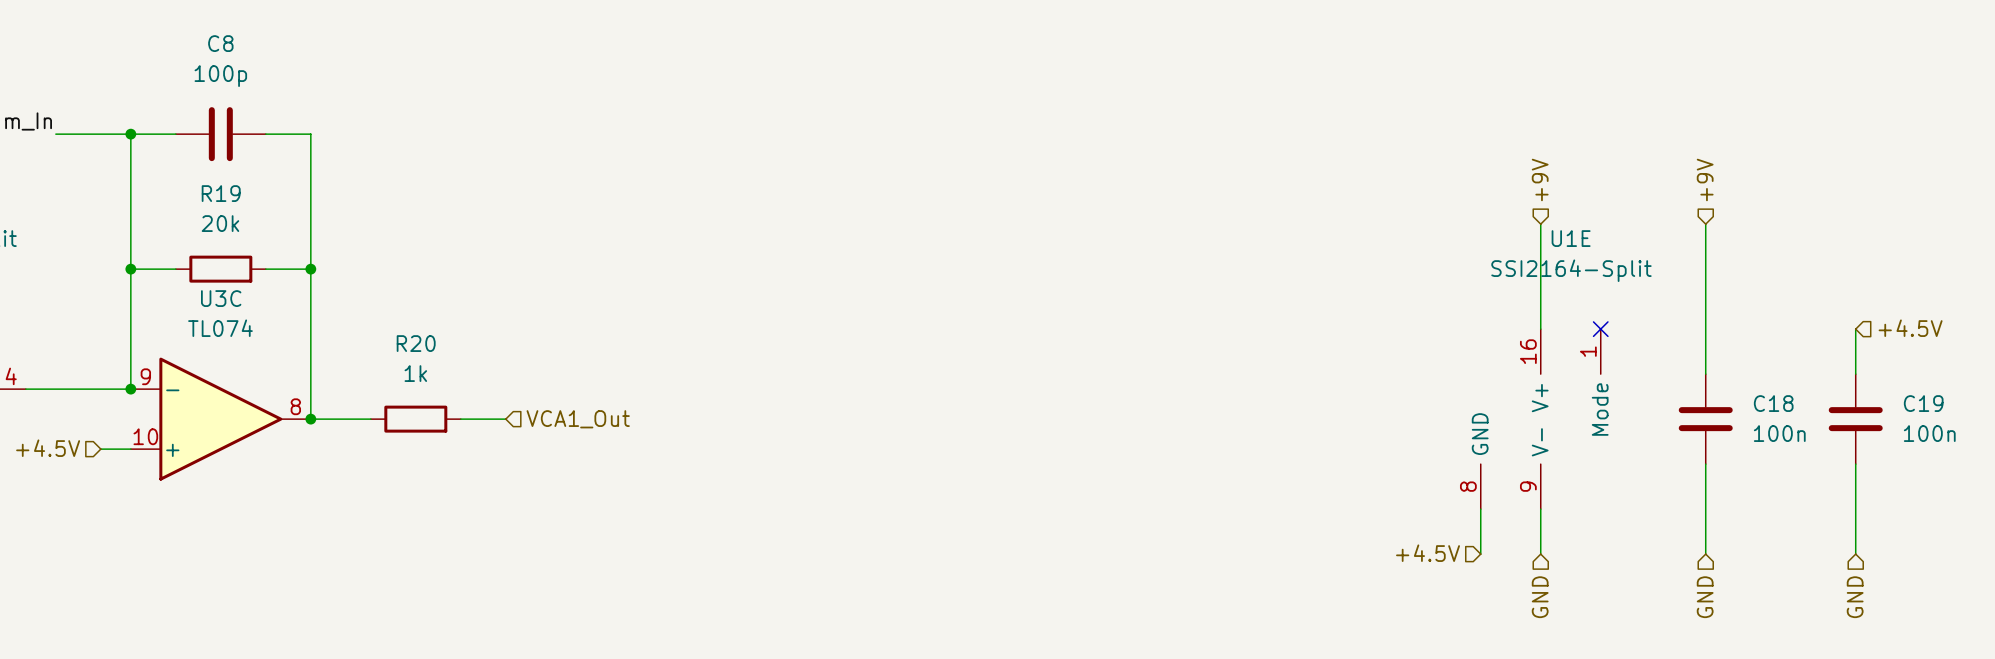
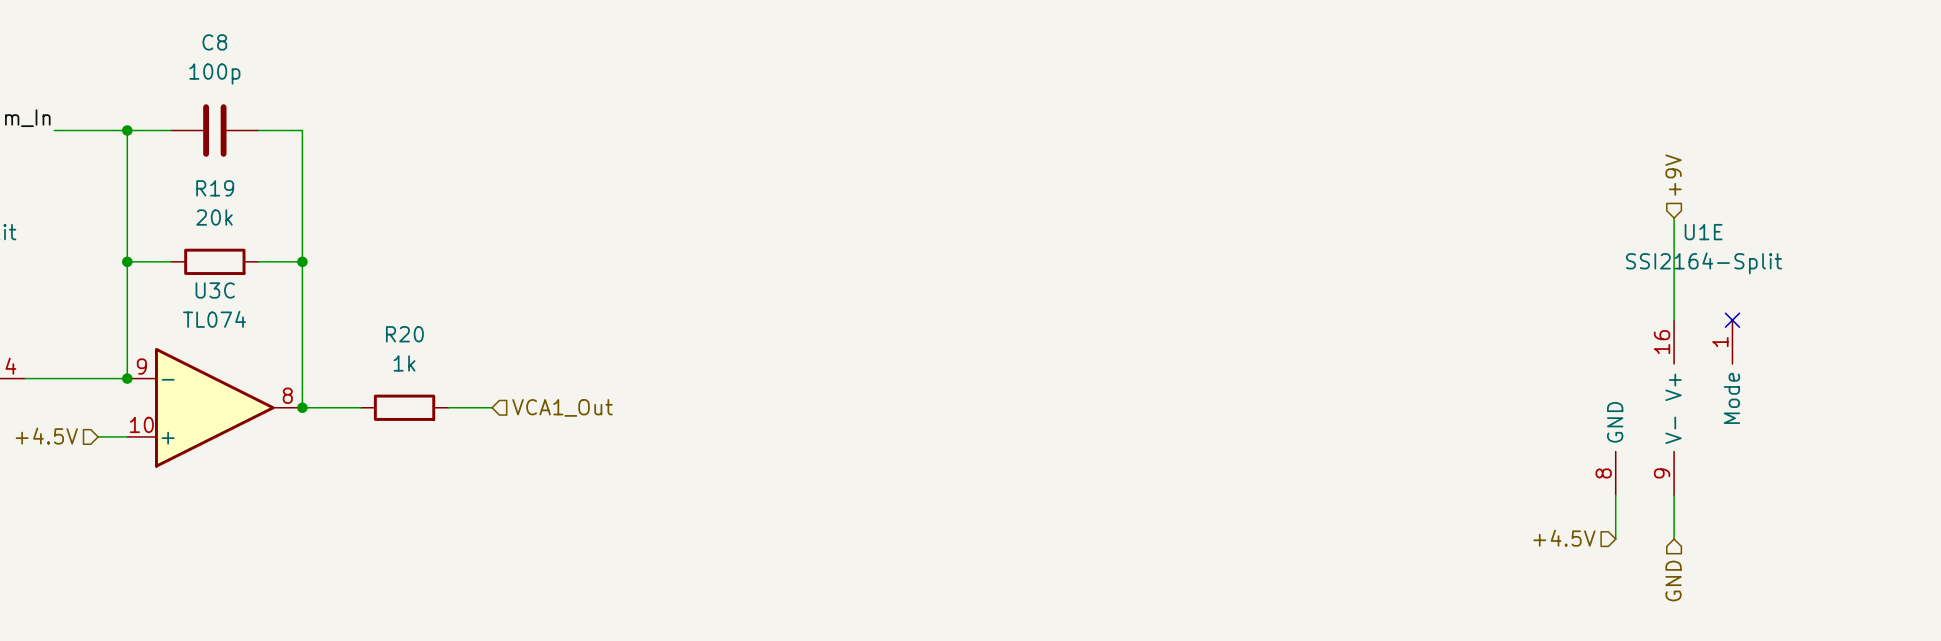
hierarchical label: +9V (1540, 179) -> none
hierarchical label position: +9V (1705, 179) -> +9V (1673, 175)
wire: (1540, 224) (1540, 329) -> (1674, 218) (1674, 320)
wire: (1705, 224) (1705, 374) -> none
hierarchical label: +4.5V (1910, 328) -> none
no-connect mark: (1600, 329) -> none
no-connect mark: none -> (1732, 320)
wire: (1855, 329) (1855, 374) -> none
U1E position: (1540, 419) -> (1674, 407)
C18: 100n (1705, 419) -> none
C19: 100n (1855, 419) -> none
wire: (1705, 464) (1705, 554) -> none
wire: (1855, 464) (1855, 554) -> none
wire: (1480, 509) (1480, 554) -> (1615, 495) (1615, 539)
wire: (1540, 509) (1540, 554) -> (1674, 495) (1674, 539)
hierarchical label: +4.5V (1428, 553) -> none
hierarchical label: none -> +4.5V (1564, 538)
hierarchical label: GND (1540, 597) -> none
hierarchical label position: GND (1705, 597) -> GND (1673, 581)
hierarchical label: GND (1855, 597) -> none

